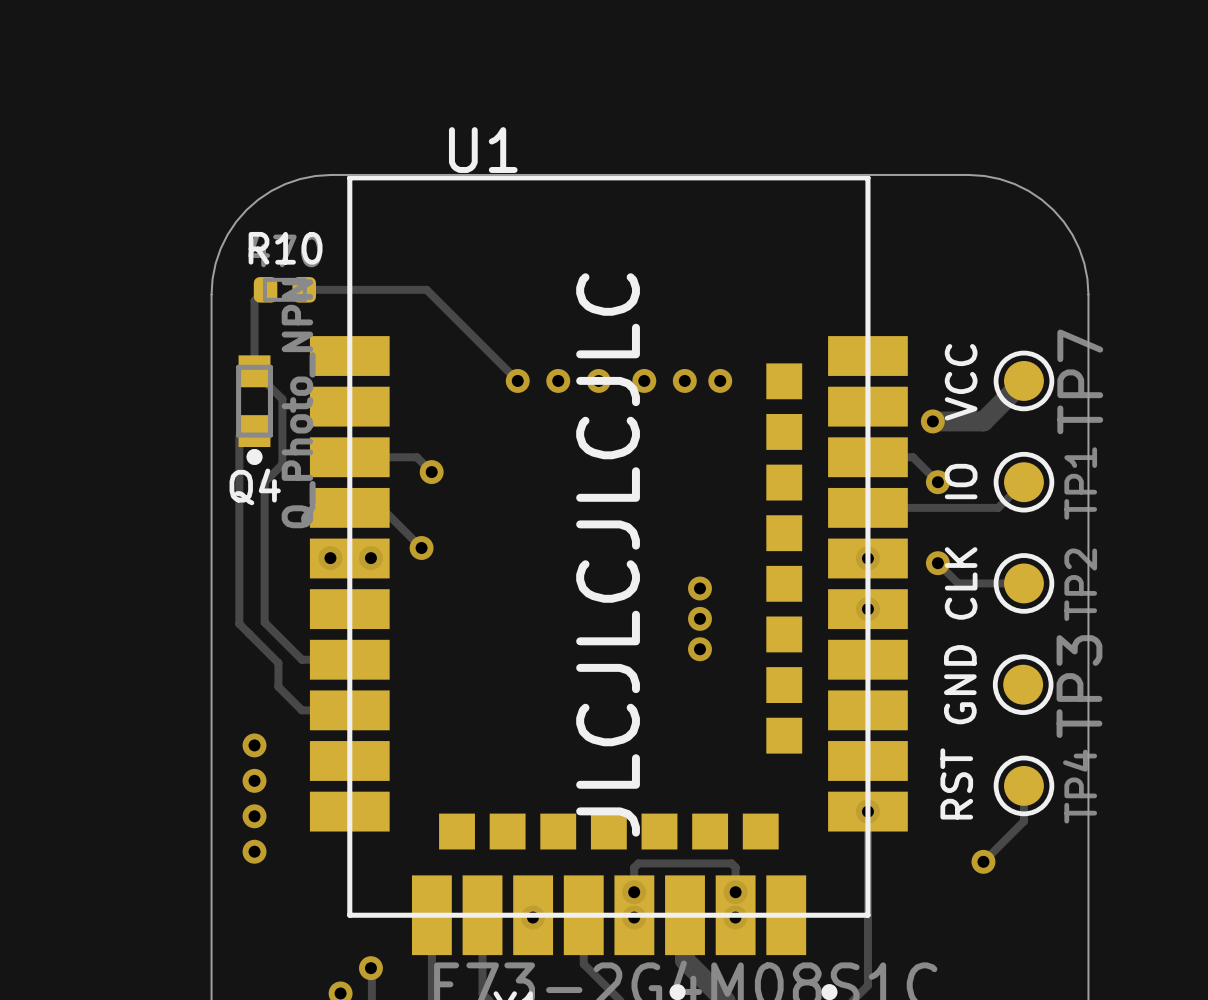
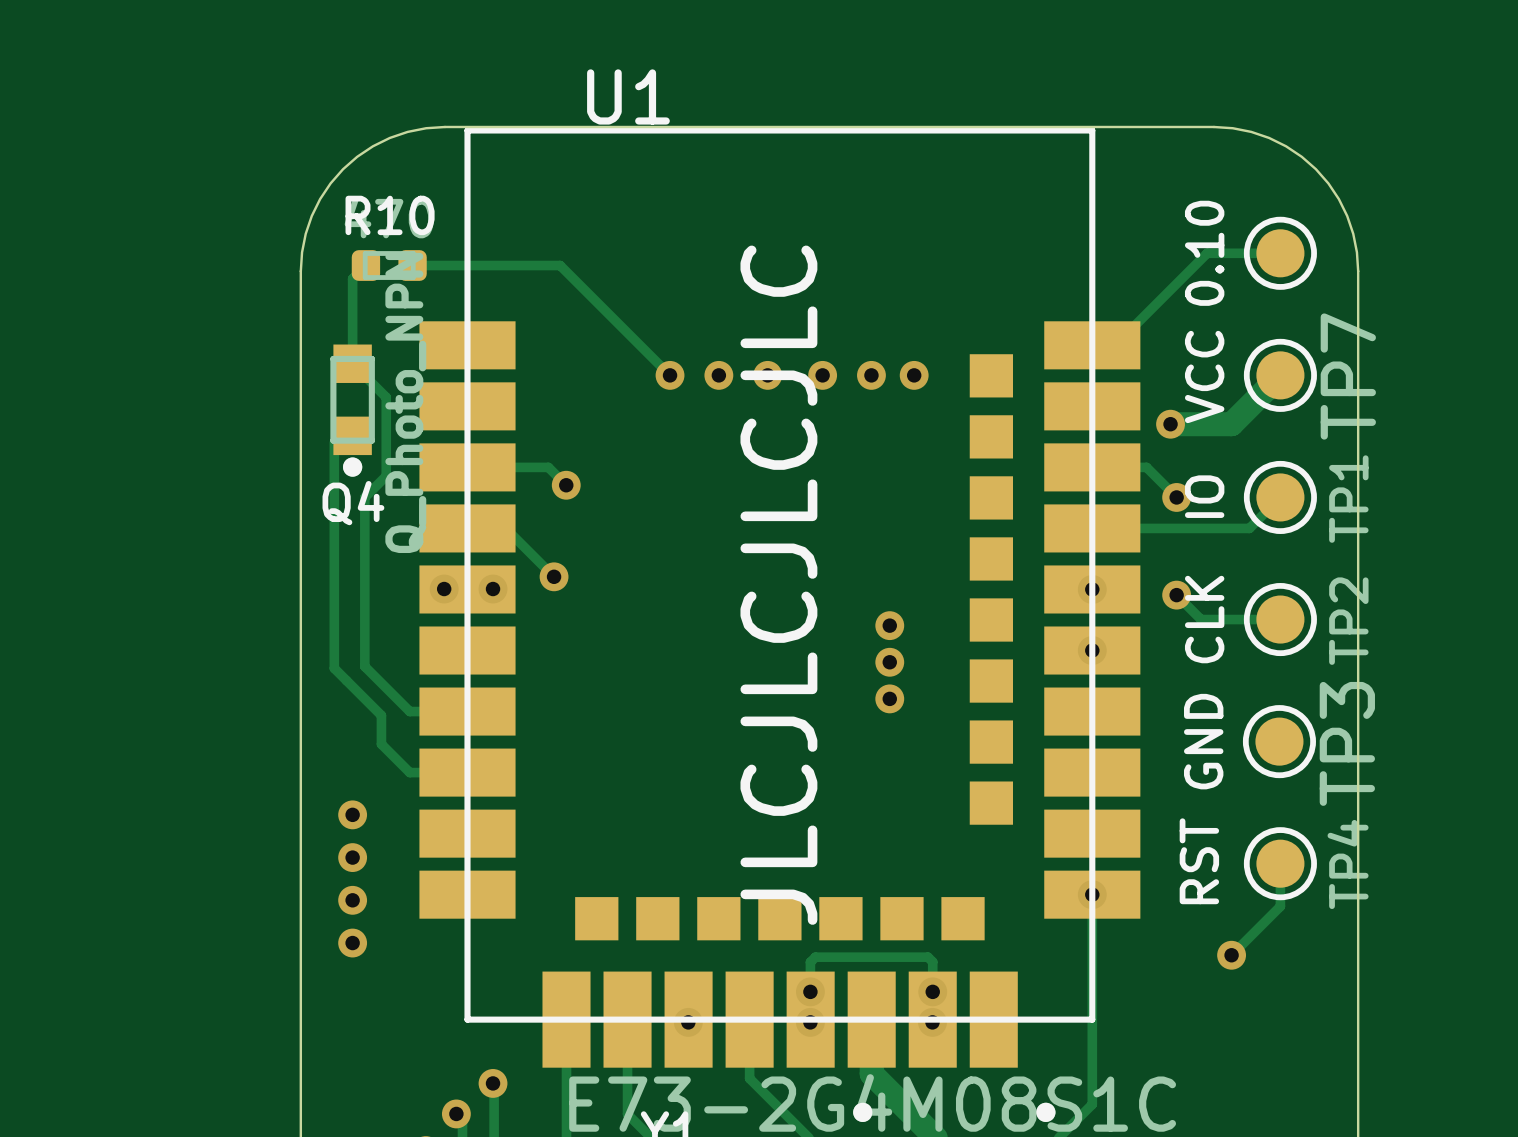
track: none -> (1280, 253) (1207, 253) (1115, 345) (1092, 345)
part: none -> 0.10 (1280, 253)

